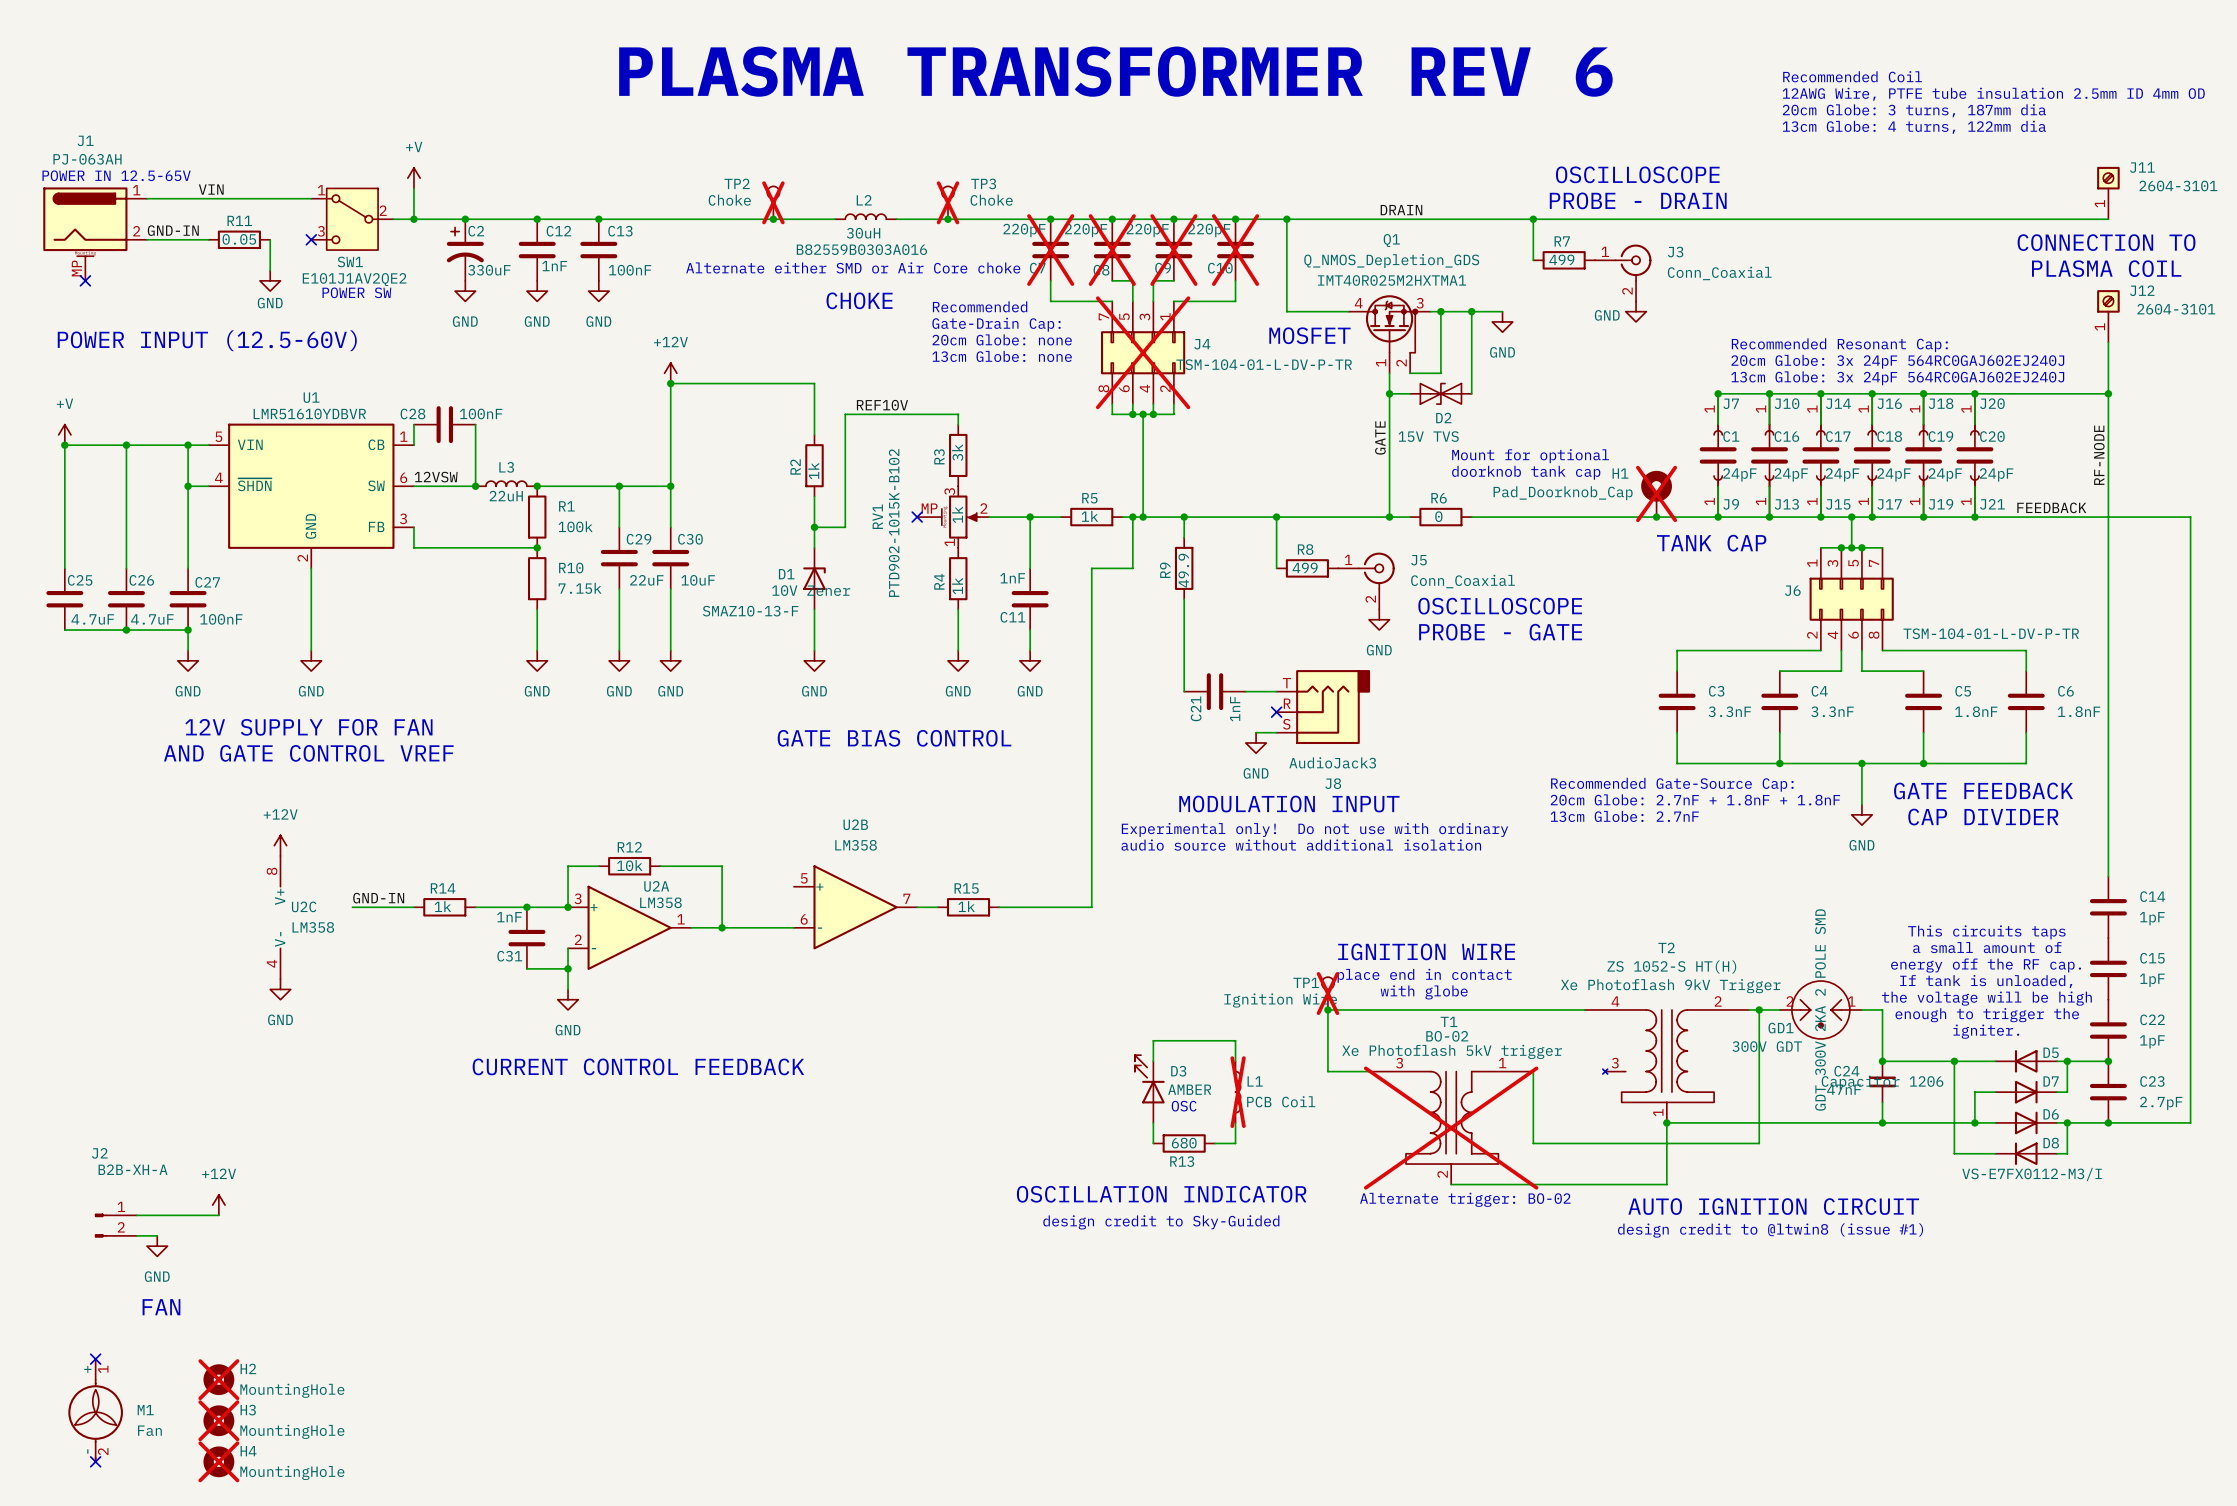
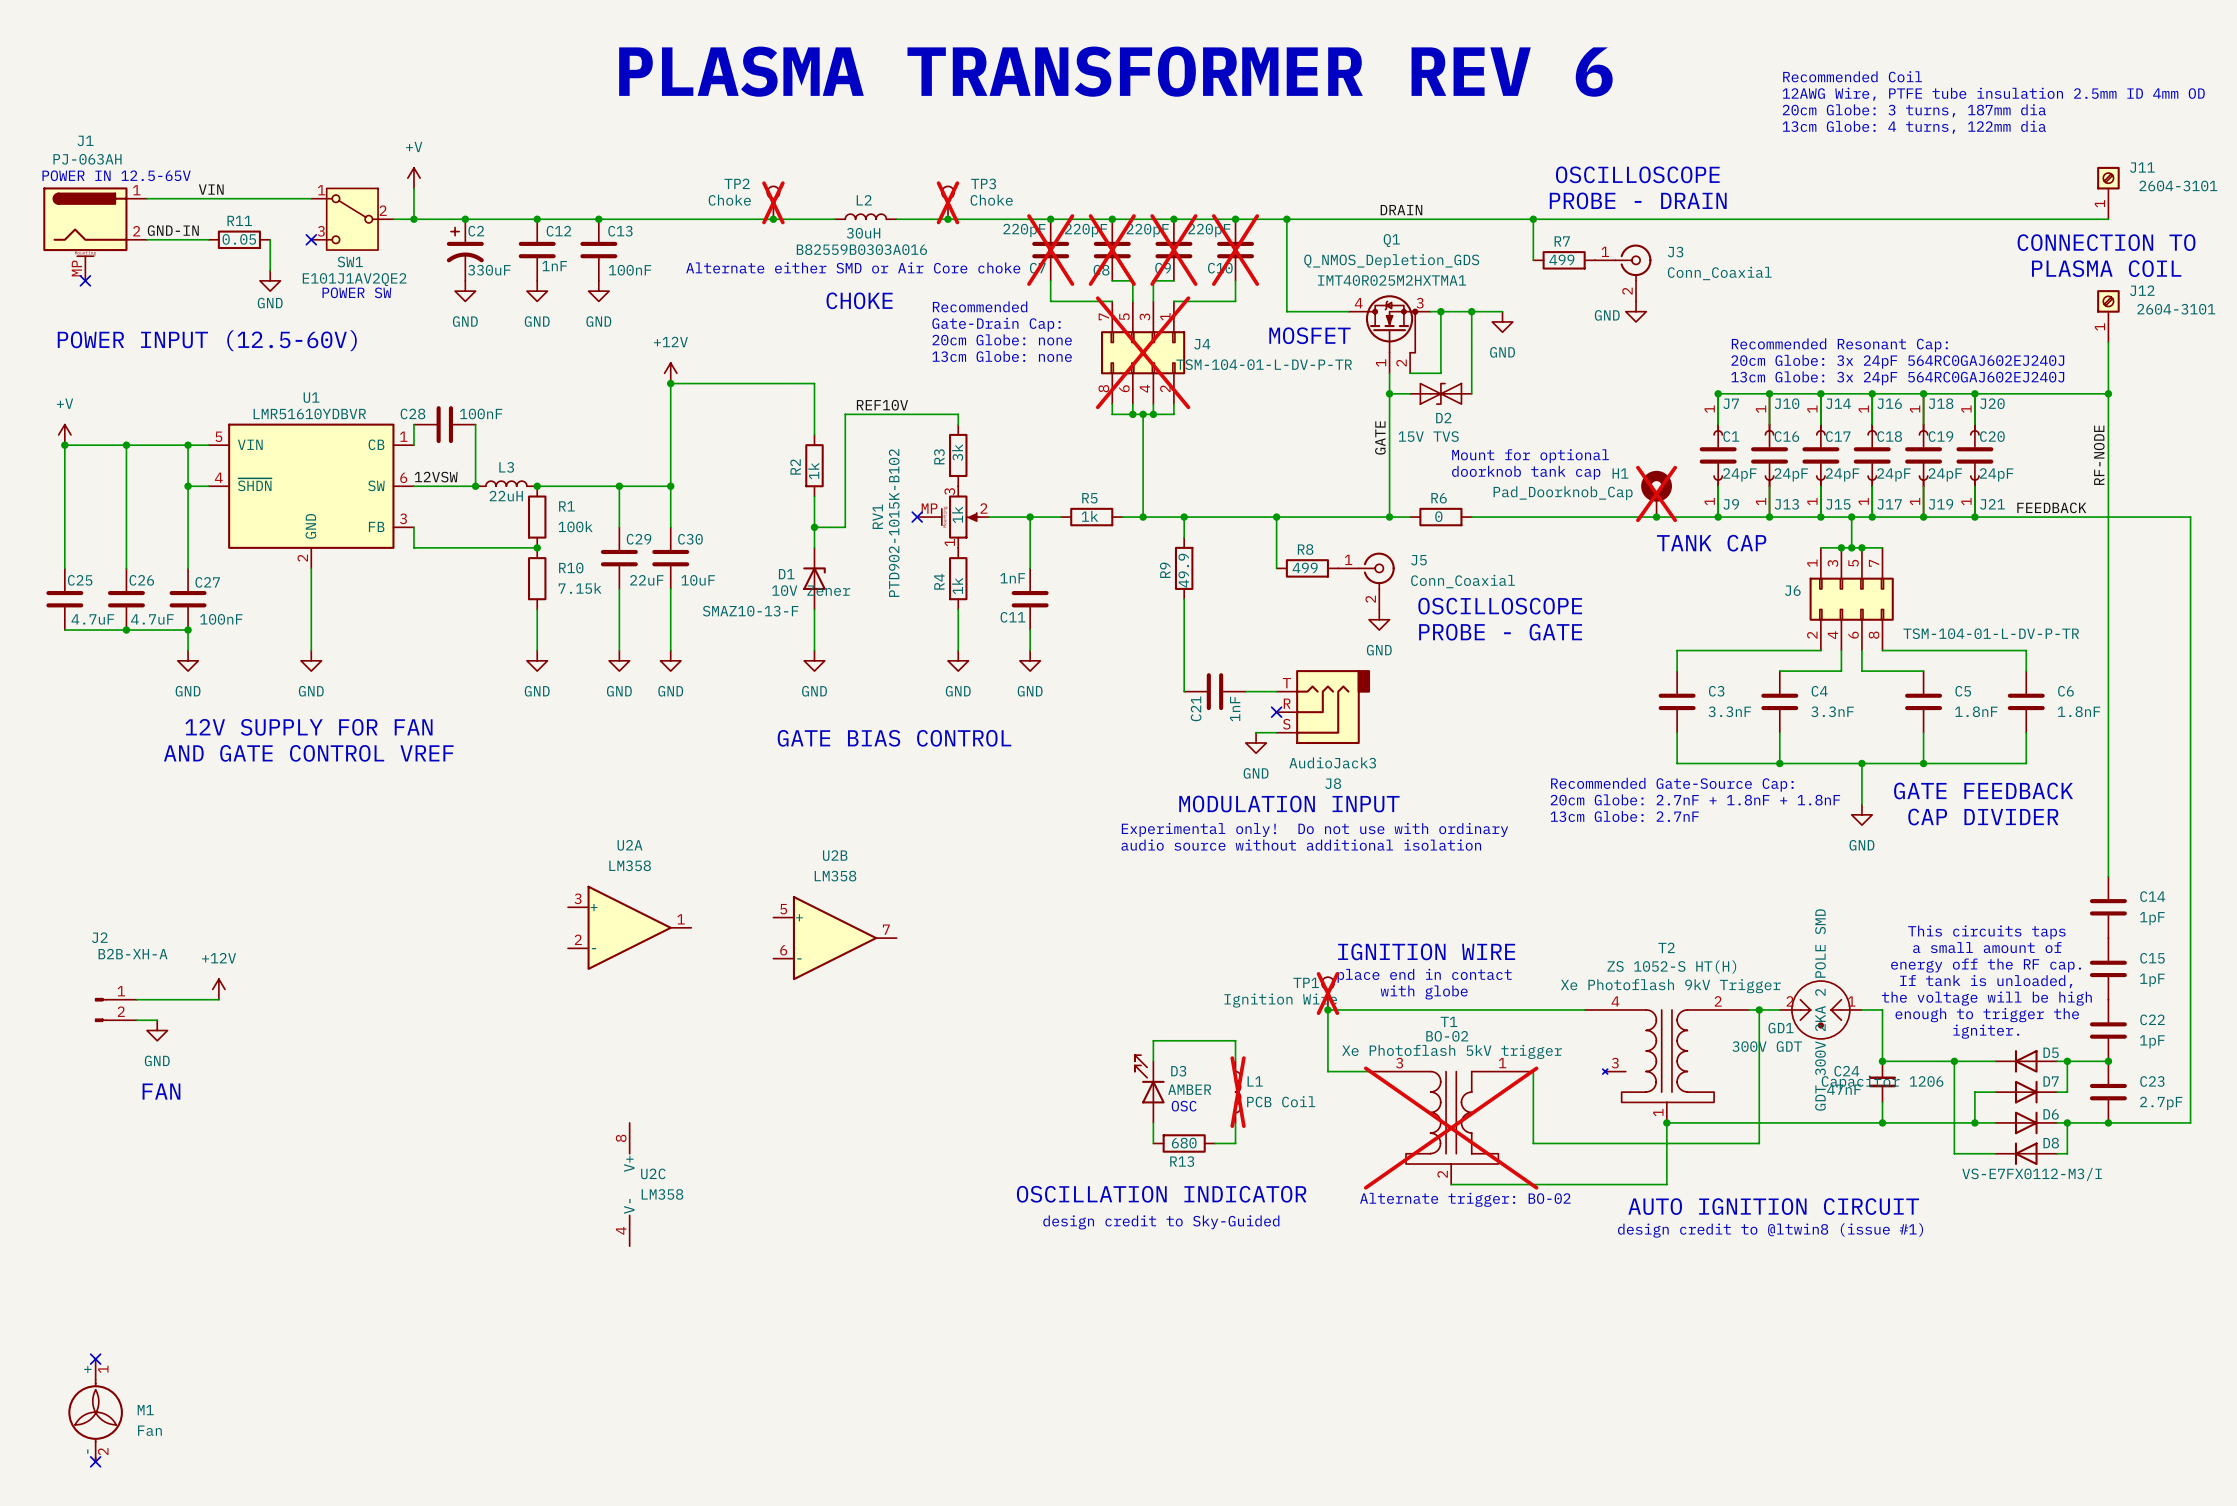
wire: (1132, 517) (1132, 568) (1091, 568) (1091, 907) (999, 907) -> none
junction: (1132, 517) -> none
power symbol: +12V (280, 845) -> none
wire: (598, 866) (568, 866) (568, 907) (475, 907) -> none
R12: 10k (629, 866) -> none
wire: (660, 866) (722, 866) (722, 927) -> none
U2A name position: U2A (656, 886) -> U2A (630, 845)
label: GND-IN (378, 898) -> none
U2A value position: LM358 (660, 902) -> LM358 (630, 865)
wire: (352, 907) (413, 907) -> none
R14: 1k (444, 907) -> none
junction: (526, 907) -> none
junction: (568, 907) -> none
U2B position: (855, 907) -> (835, 938)
wire: (917, 907) (937, 907) -> none
R15: 1k (968, 907) -> none
U2C position: (280, 917) -> (629, 1184)
wire: (691, 927) (793, 927) -> none
junction: (722, 927) -> none
C31: 1nF (526, 938) -> none
wire: (568, 948) (568, 989) -> none
wire: (526, 968) (568, 968) -> none
junction: (568, 968) -> none
power symbol: none -> +12V (218, 989)
power symbol: GND (280, 989) -> none
wire: none -> (136, 999) (218, 999)
power symbol: GND (568, 999) -> none
wire: none -> (136, 1020) (157, 1020)
power symbol: none -> GND (157, 1030)
text: CURRENT CONTROL FEEDBACK (638, 1066) -> none
text: none -> FAN (161, 1091)
power symbol: +12V (218, 1205) -> none
wire: (136, 1215) (218, 1215) -> none
J2 position: (115, 1225) -> (115, 1009)
wire: (136, 1235) (157, 1235) -> none
power symbol: GND (157, 1246) -> none
text: FAN (161, 1307) -> none
H2: MountingHole (218, 1379) -> none
H3: MountingHole (218, 1420) -> none
H4: MountingHole (218, 1461) -> none

